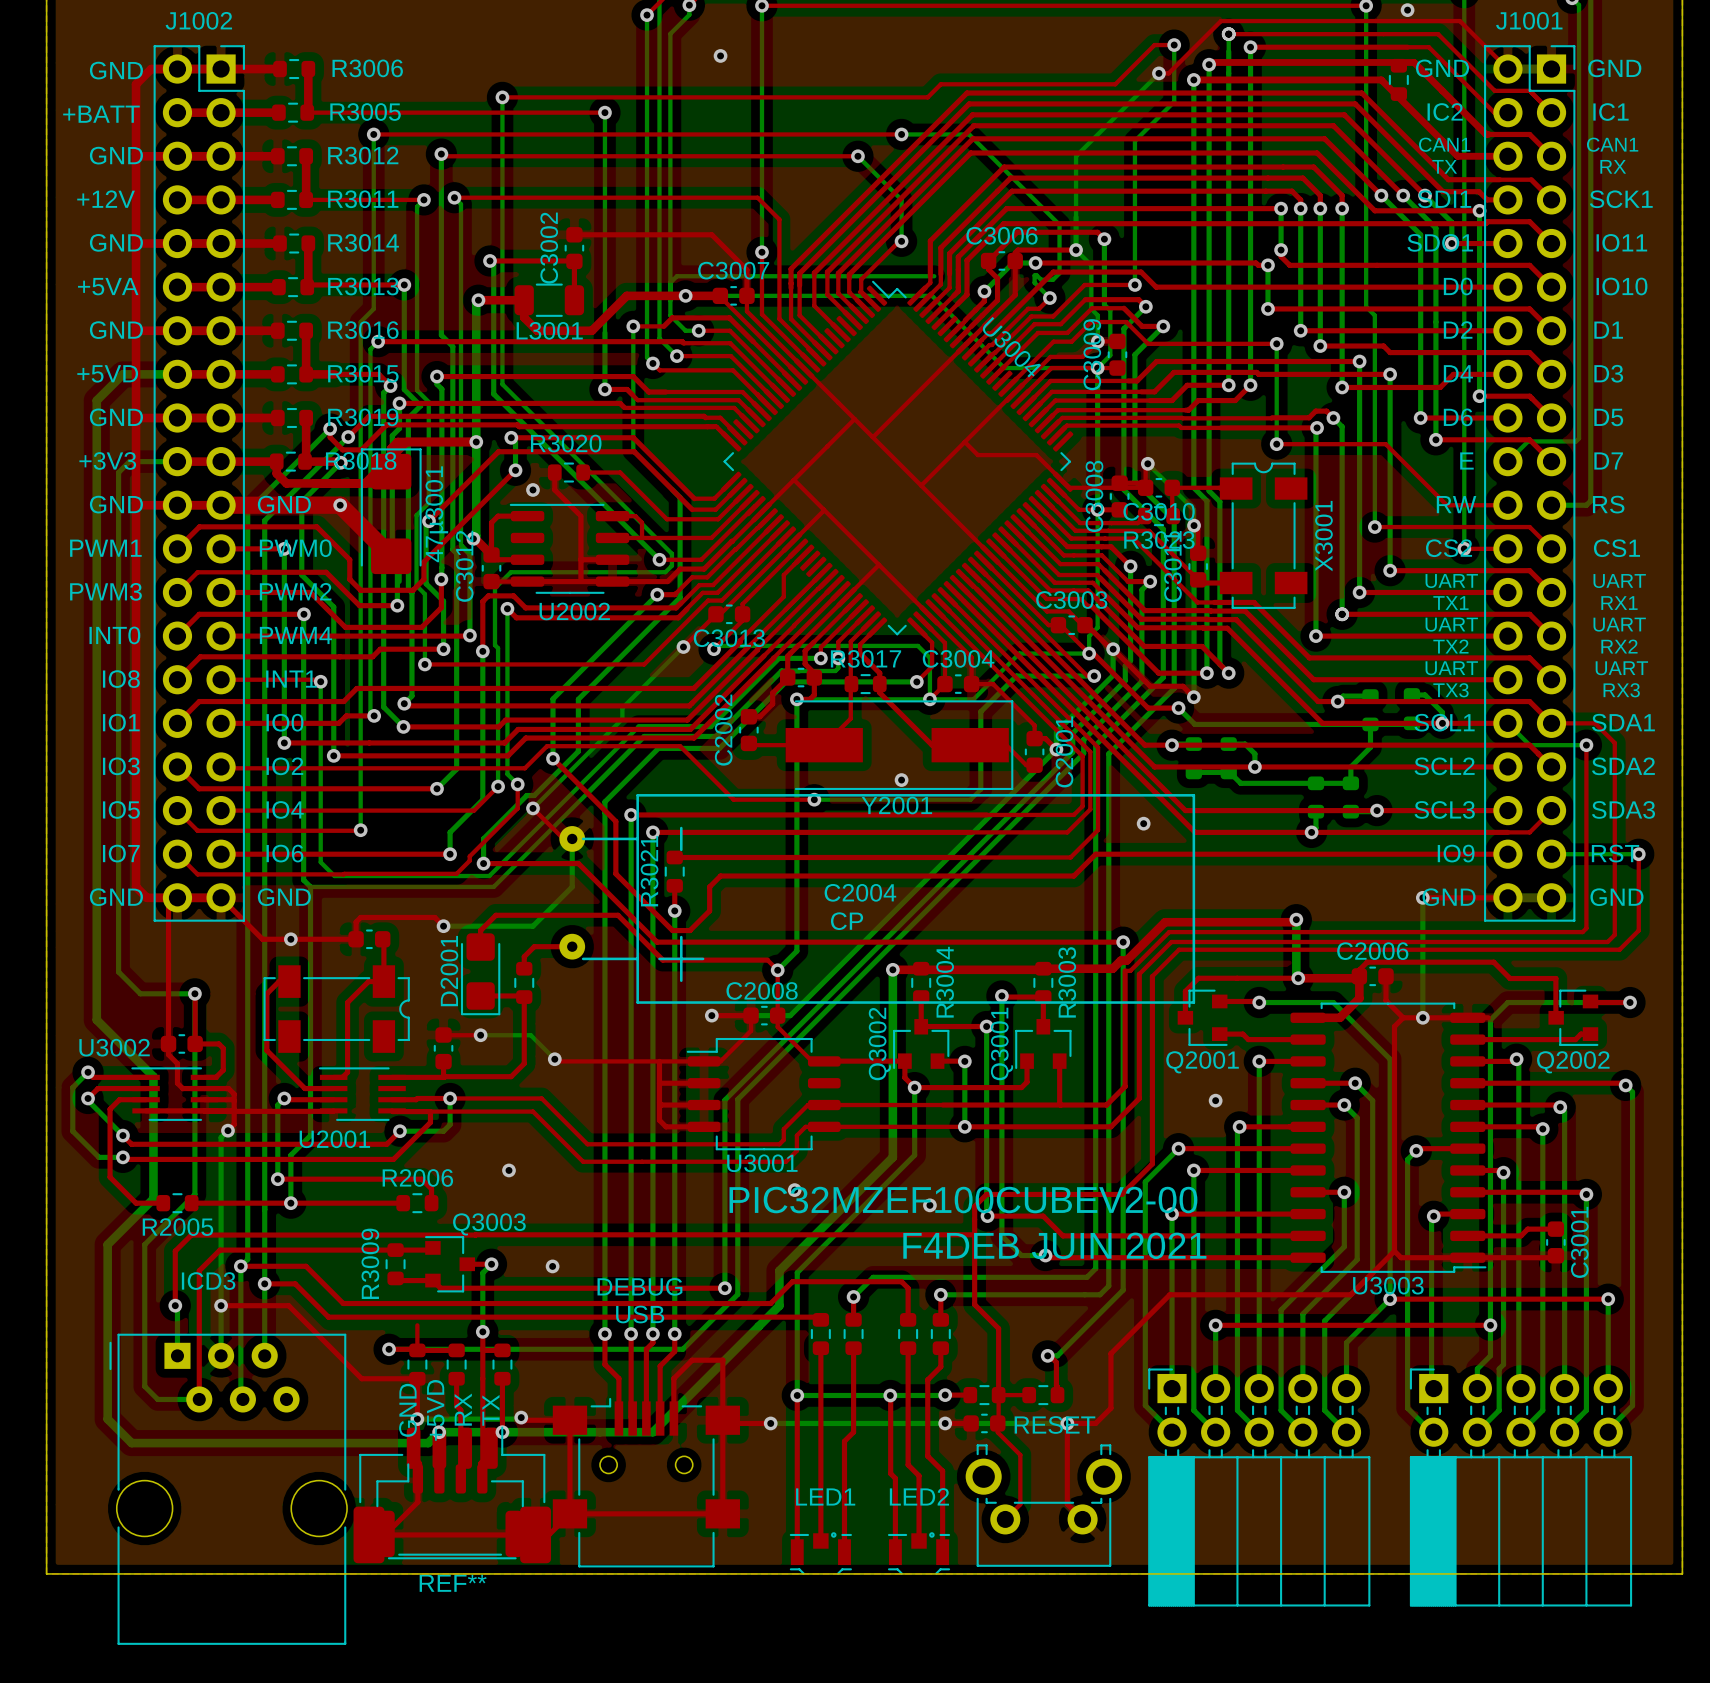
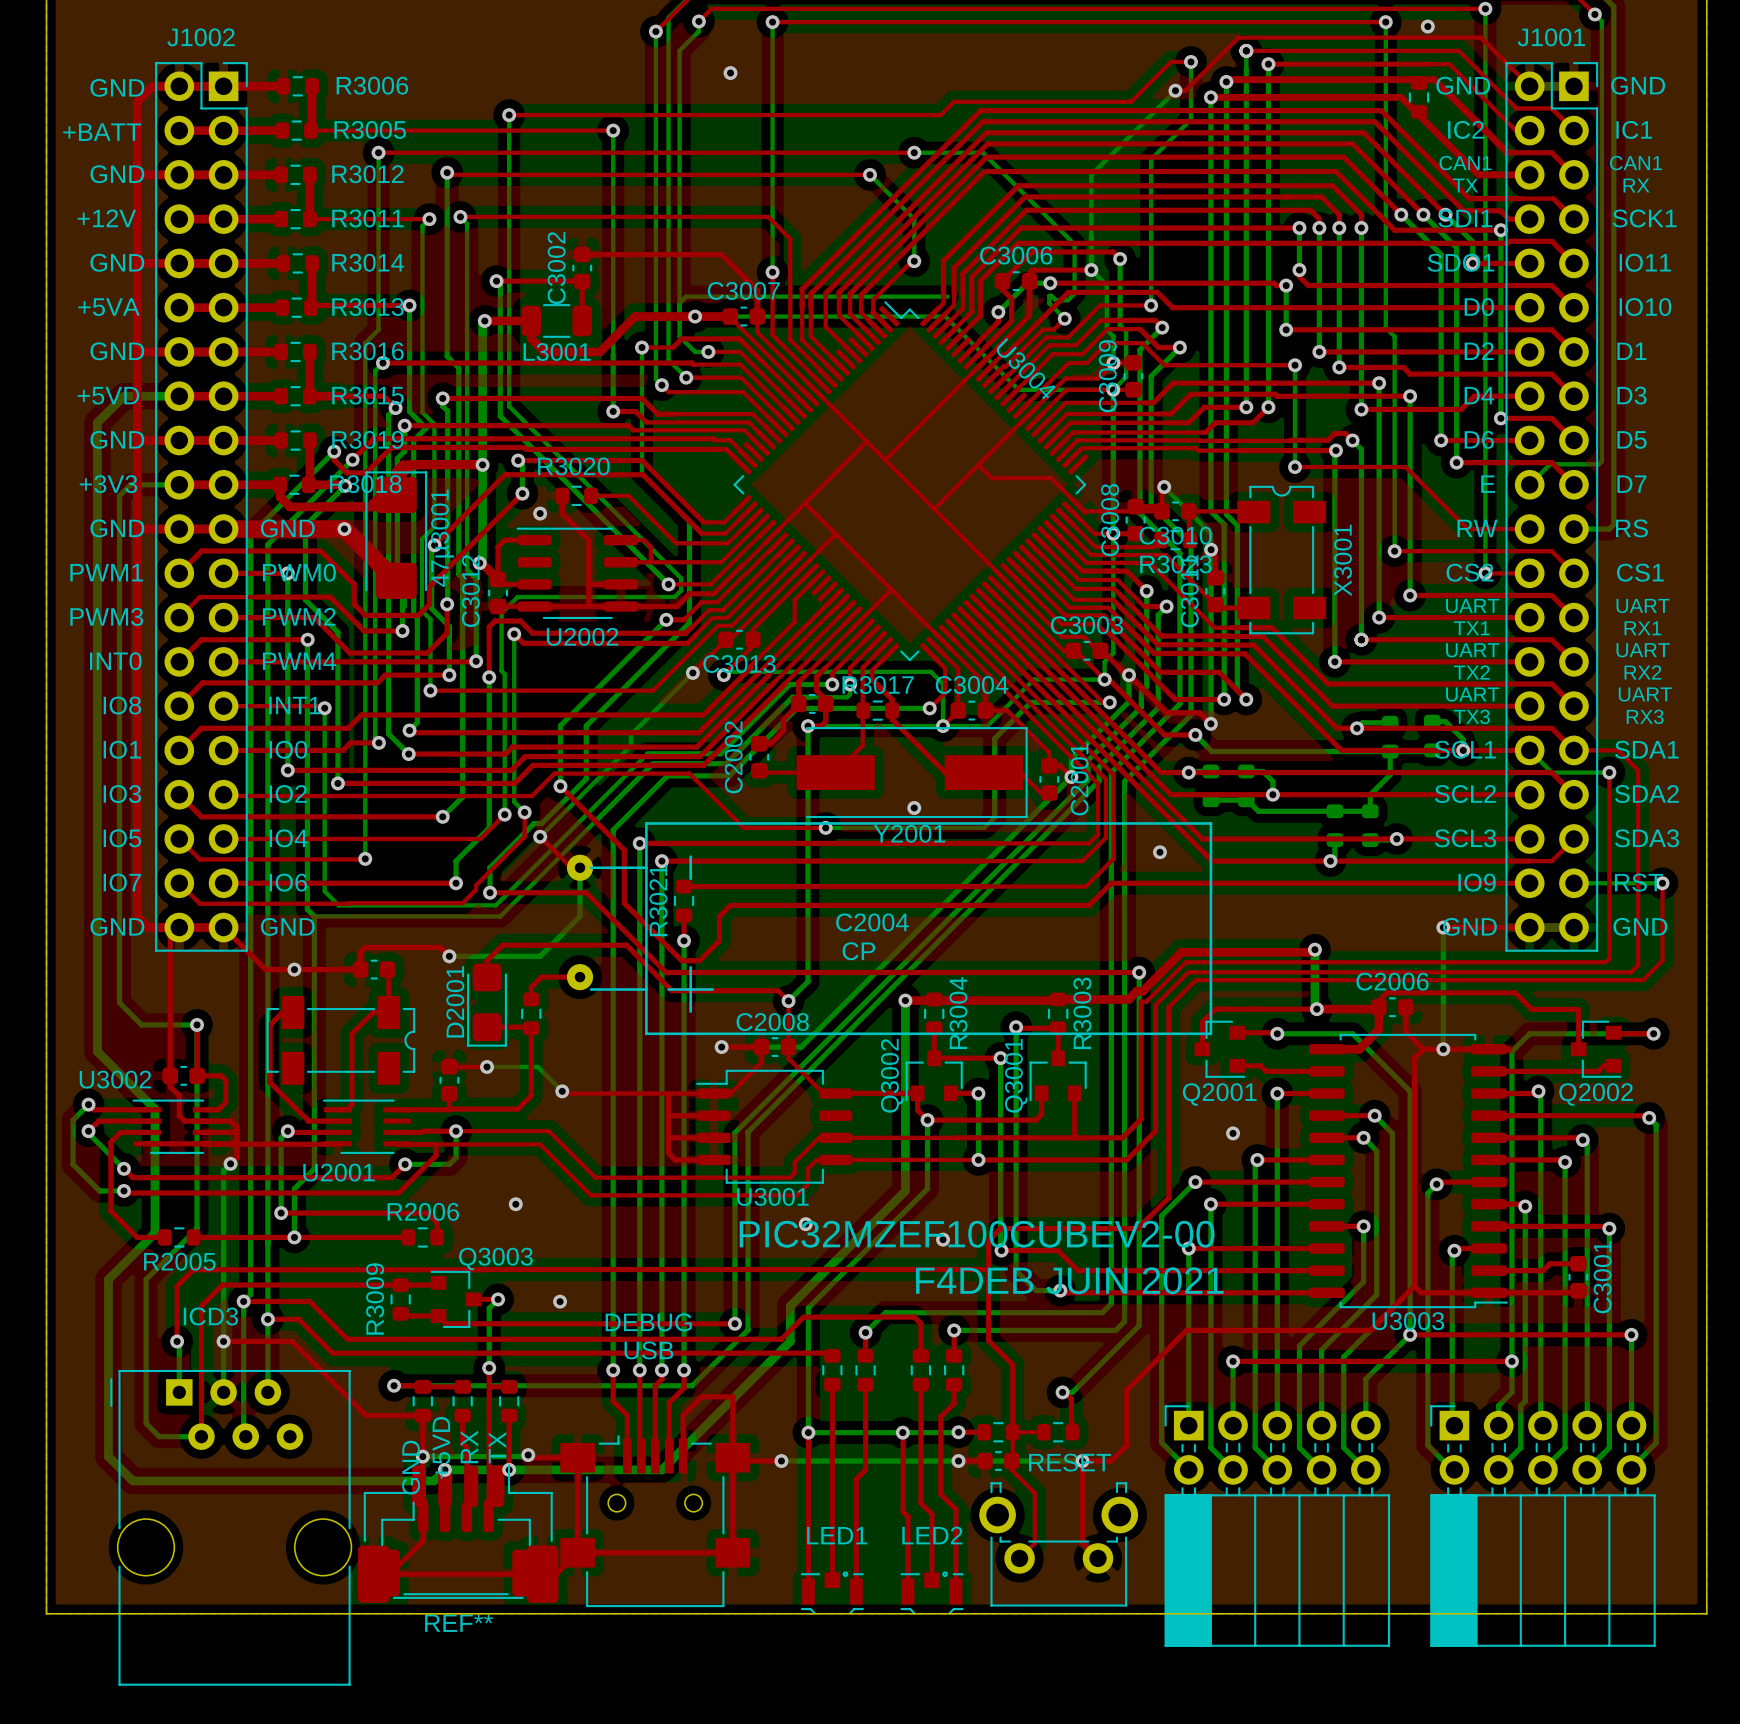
top track: (417, 1325) (417, 1350) -> none
text position: GND (407, 1410) -> GND (411, 1467)

